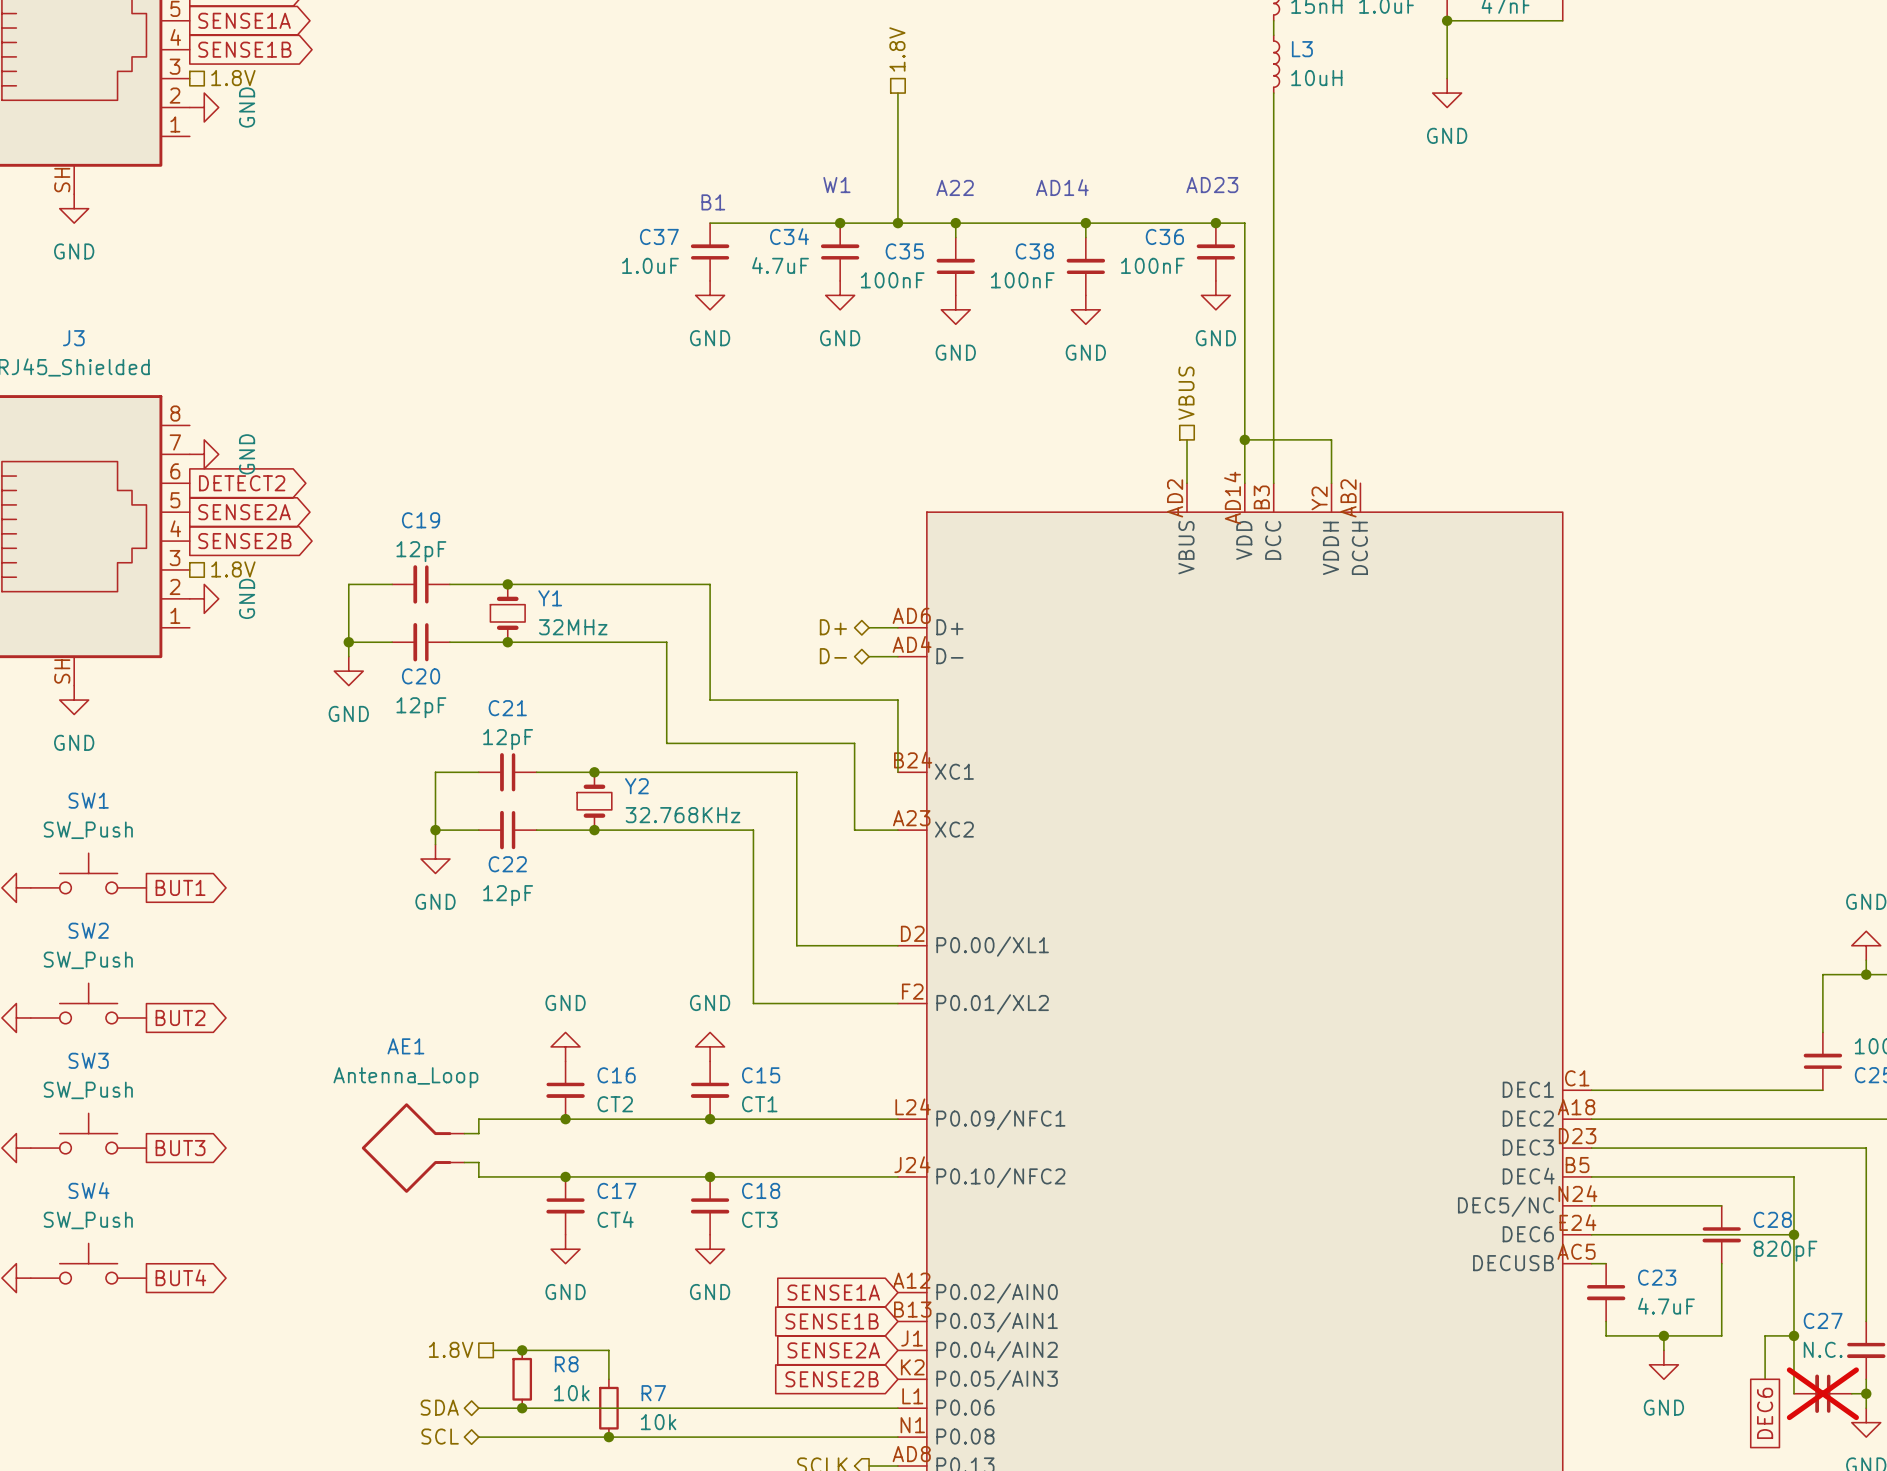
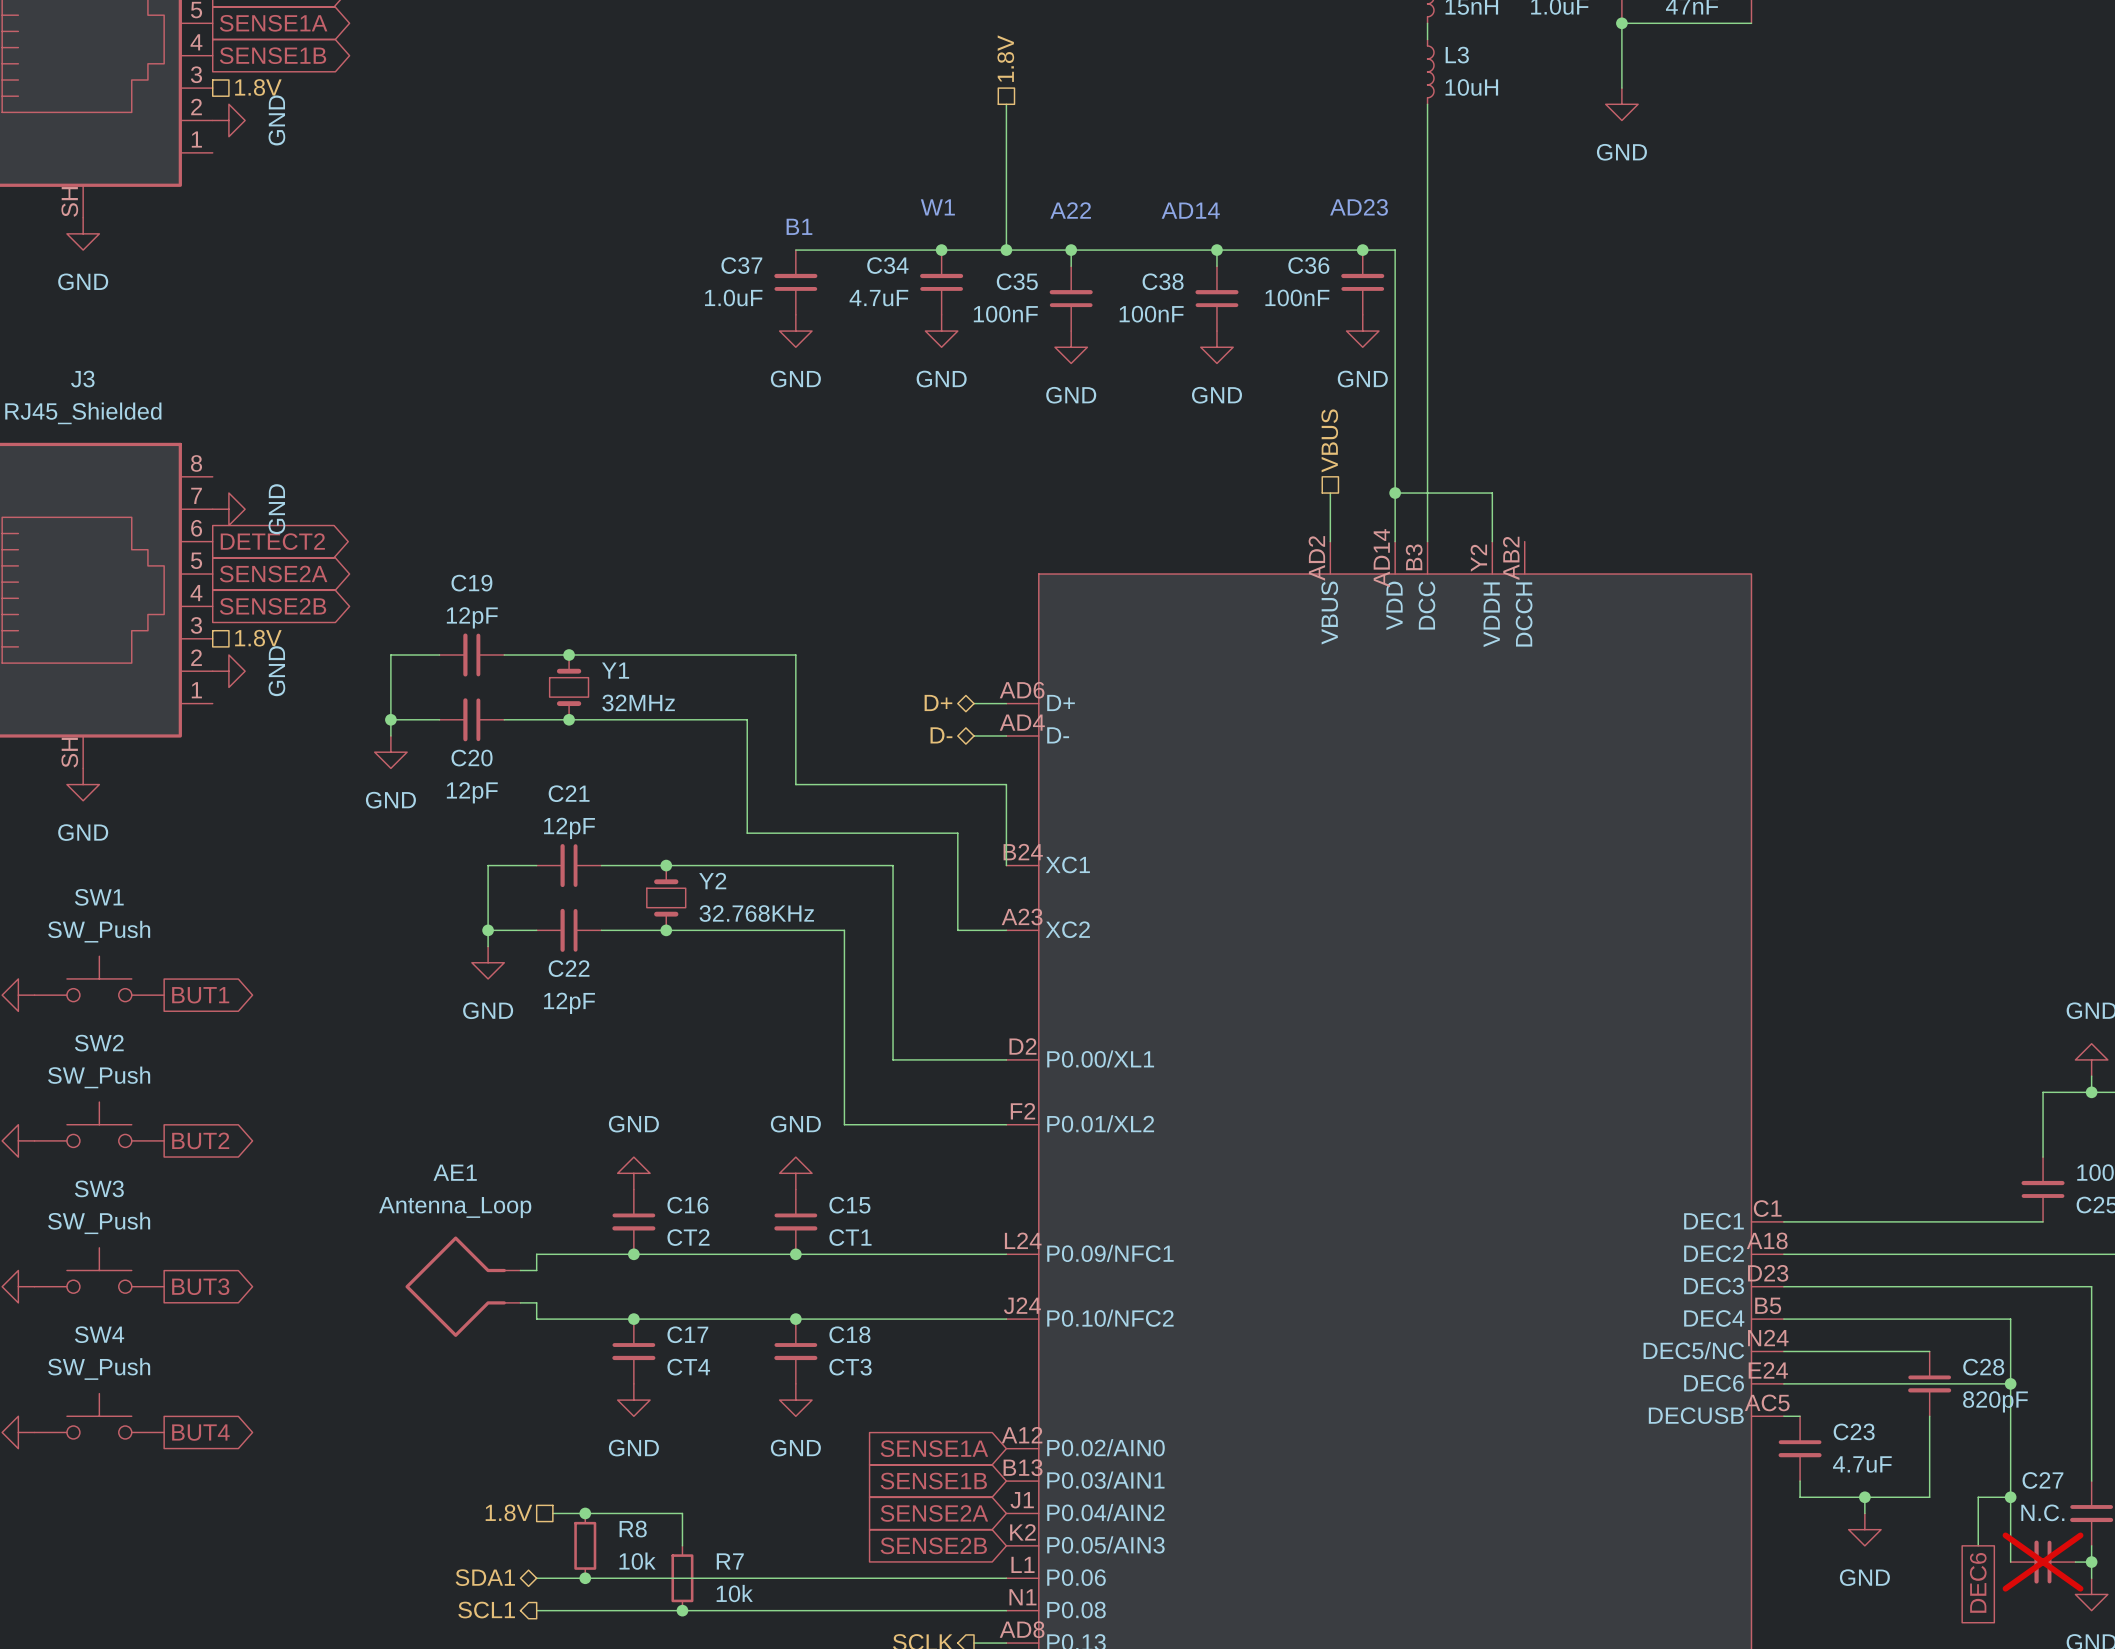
hierarchical label: SDA (439, 1407) -> SDA1 (485, 1577)
hierarchical label shape: bidirectional (440, 1436) -> output (486, 1610)
hierarchical label: SCL (440, 1436) -> SCL1 (486, 1610)

